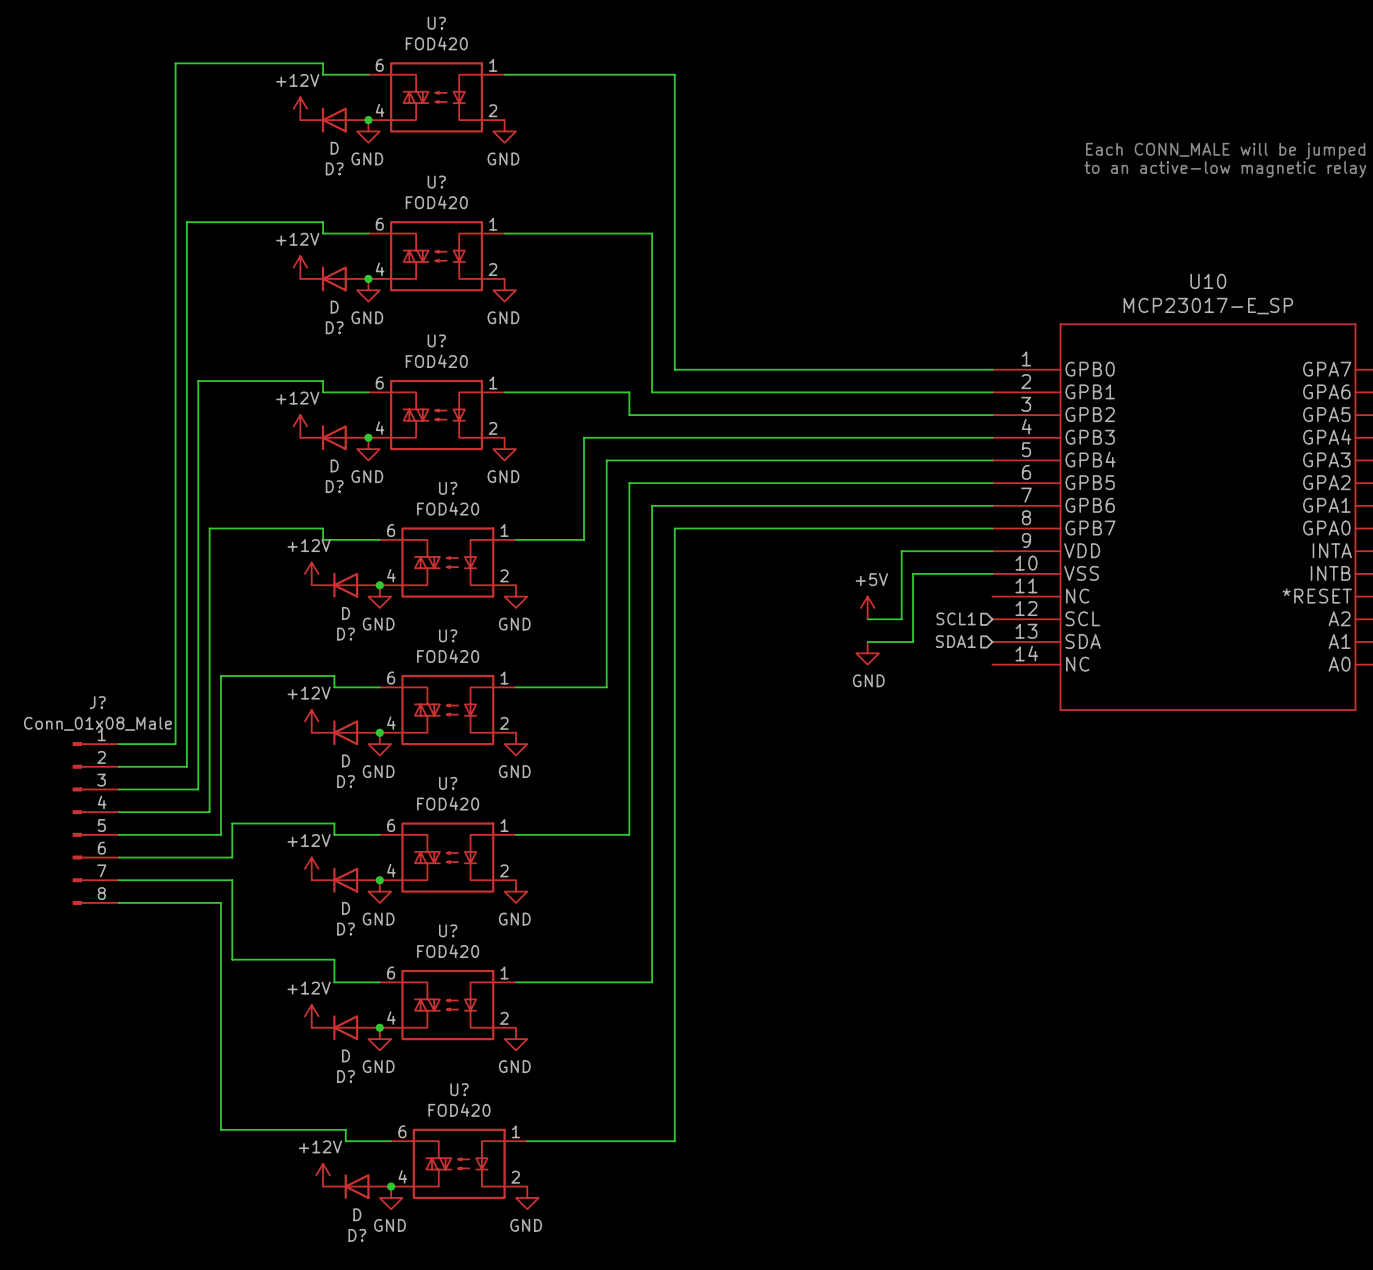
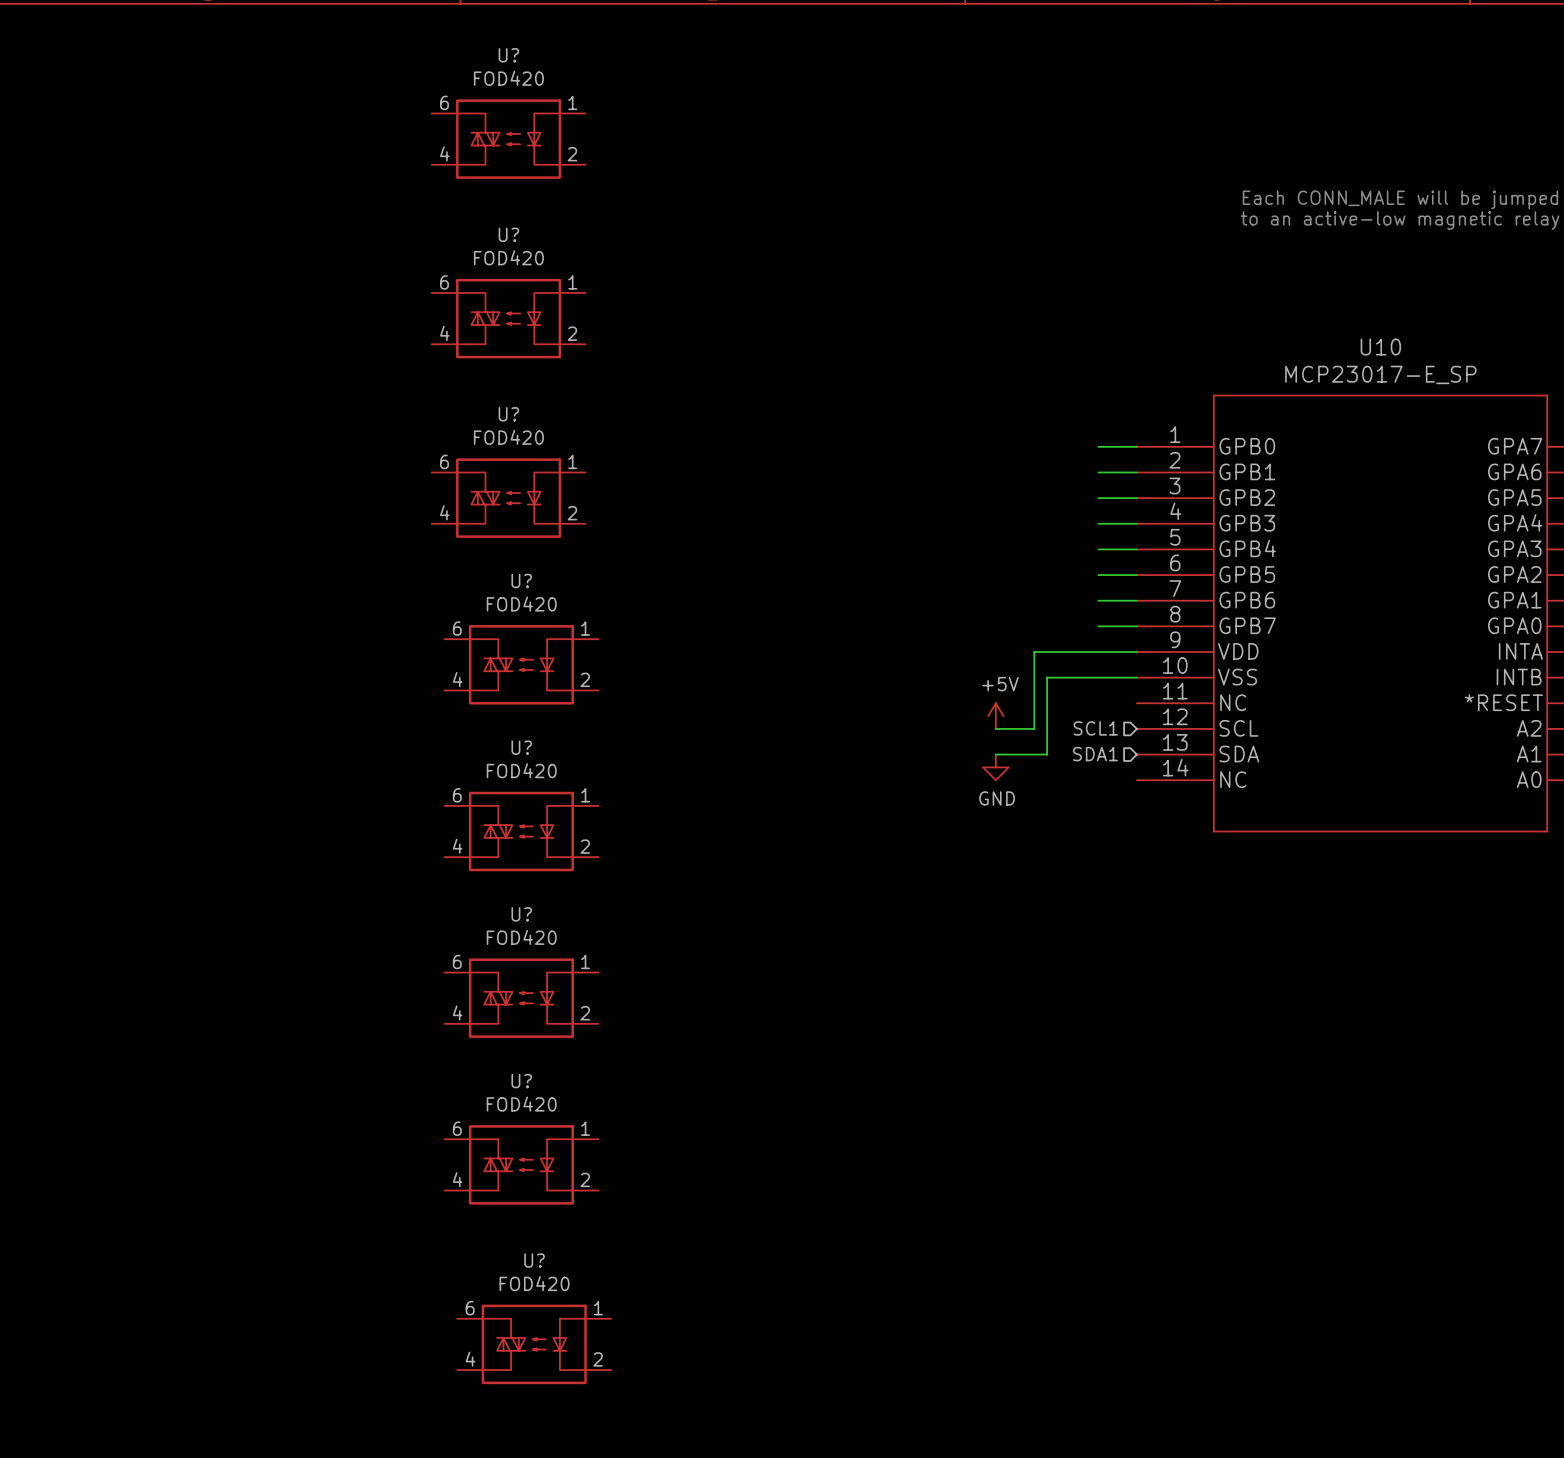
wire: (368, 74) (323, 74) (323, 63) (175, 63) (175, 744) (118, 744) -> none
wire: (504, 74) (674, 74) (674, 369) (958, 369) -> none
power symbol: +12V (300, 108) -> none
D?: D (334, 120) -> none
junction: (368, 120) -> none
power symbol: GND (368, 131) -> none
power symbol: GND (504, 131) -> none
wire: (368, 233) (323, 233) (323, 222) (186, 222) (186, 766) (118, 766) -> none
wire: (504, 233) (652, 233) (652, 392) (958, 392) -> none
power symbol: +12V (300, 267) -> none
D?: D (334, 278) -> none
junction: (368, 278) -> none
power symbol: GND (368, 290) -> none
power symbol: GND (504, 290) -> none
wire: (368, 392) (323, 392) (323, 381) (198, 381) (198, 789) (118, 789) -> none
wire: (504, 392) (629, 392) (629, 415) (958, 415) -> none
power symbol: +12V (300, 426) -> none
D?: D (334, 437) -> none
junction: (368, 437) -> none
wire: (958, 437) (584, 437) (584, 539) (515, 539) -> none
power symbol: GND (368, 449) -> none
power symbol: GND (504, 449) -> none
wire: (958, 460) (606, 460) (606, 687) (515, 687) -> none
wire: (958, 483) (629, 483) (629, 834) (515, 834) -> none
wire: (958, 505) (652, 505) (652, 982) (515, 982) -> none
wire: (958, 528) (674, 528) (674, 1141) (527, 1141) -> none
wire: (379, 539) (323, 539) (323, 528) (209, 528) (209, 812) (118, 812) -> none
power symbol: +12V (311, 573) -> none
D?: D (345, 585) -> none
junction: (379, 585) -> none
power symbol: GND (379, 596) -> none
power symbol: GND (515, 596) -> none
wire: (379, 687) (334, 687) (334, 676) (220, 676) (220, 834) (118, 834) -> none
power symbol: +12V (311, 721) -> none
D?: D (345, 732) -> none
junction: (379, 732) -> none
power symbol: GND (379, 744) -> none
power symbol: GND (515, 744) -> none
J?: Conn_01x08_Male (95, 823) -> none
wire: (379, 834) (334, 834) (334, 823) (232, 823) (232, 857) (118, 857) -> none
power symbol: +12V (311, 868) -> none
wire: (118, 880) (232, 880) (232, 959) (334, 959) (334, 982) (379, 982) -> none
D?: D (345, 880) -> none
junction: (379, 880) -> none
power symbol: GND (379, 891) -> none
power symbol: GND (515, 891) -> none
wire: (118, 902) (220, 902) (220, 1129) (345, 1129) (345, 1141) (391, 1141) -> none
power symbol: +12V (311, 1016) -> none
D?: D (345, 1027) -> none
junction: (379, 1027) -> none
power symbol: GND (379, 1039) -> none
power symbol: GND (515, 1039) -> none
power symbol: +12V (323, 1175) -> none
D?: D (357, 1186) -> none
junction: (391, 1186) -> none
power symbol: GND (391, 1197) -> none
power symbol: GND (527, 1197) -> none

